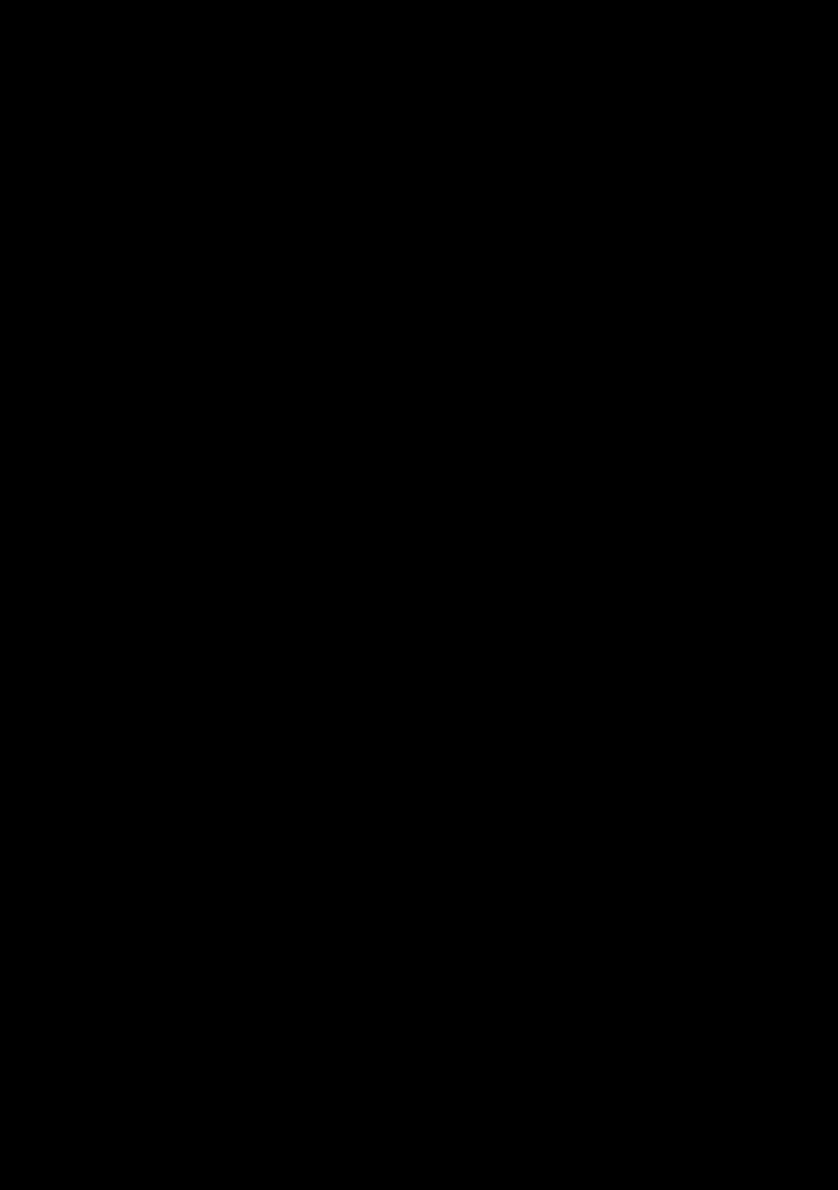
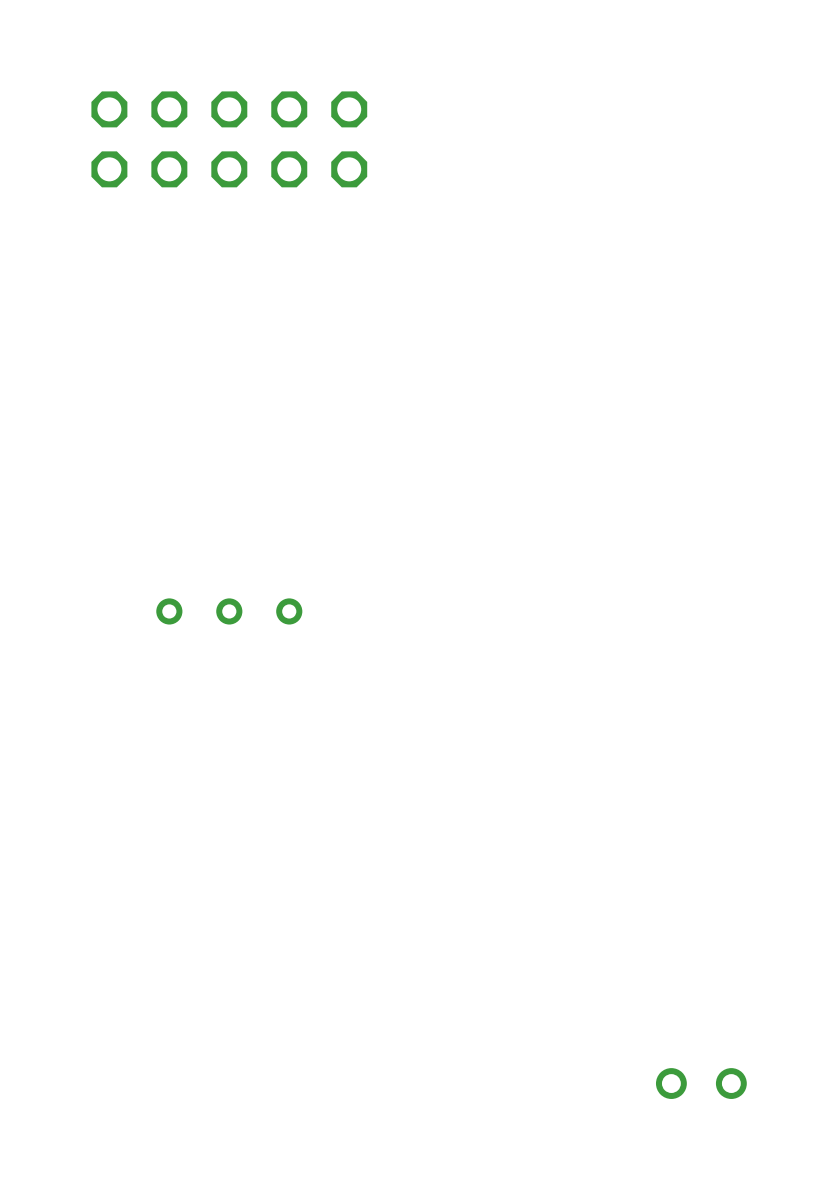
part: none -> (229, 139)
part: none -> (229, 611)
part: none -> (701, 1083)

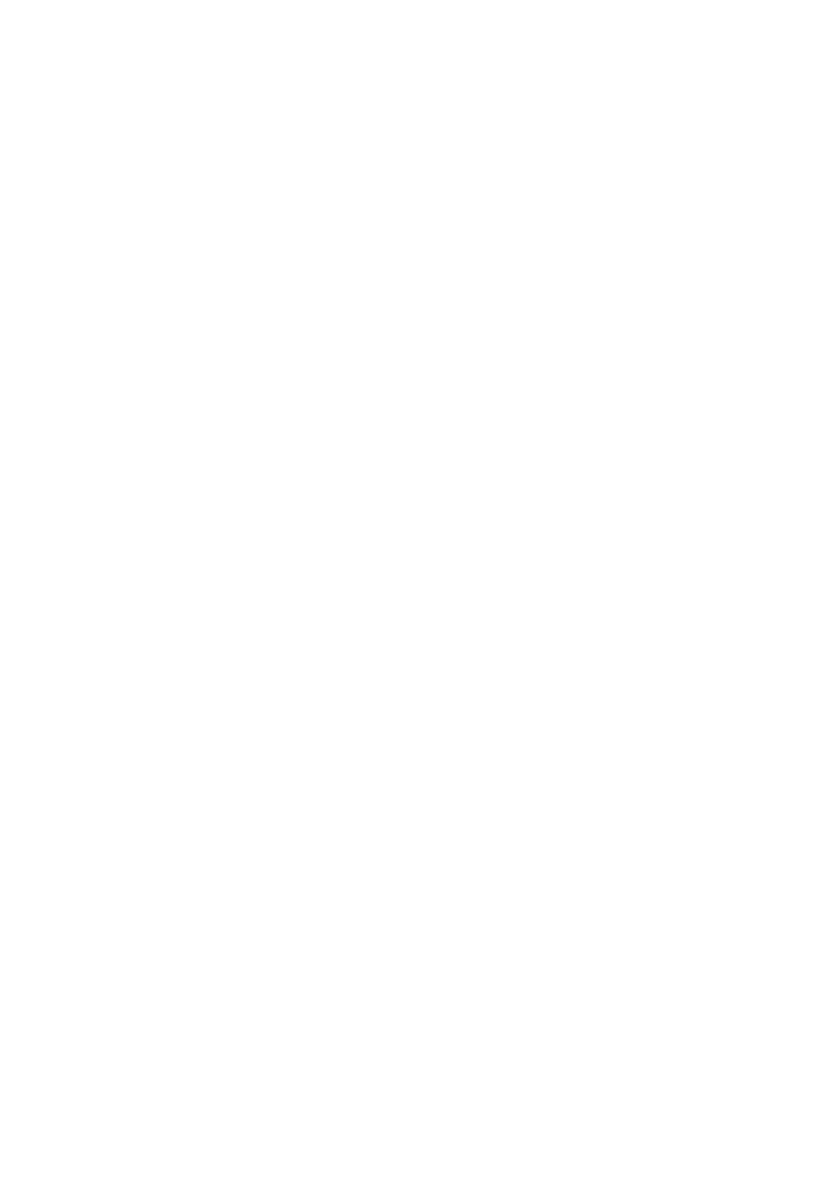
part: (229, 139) -> none
part: (229, 611) -> none
part: (701, 1083) -> none

